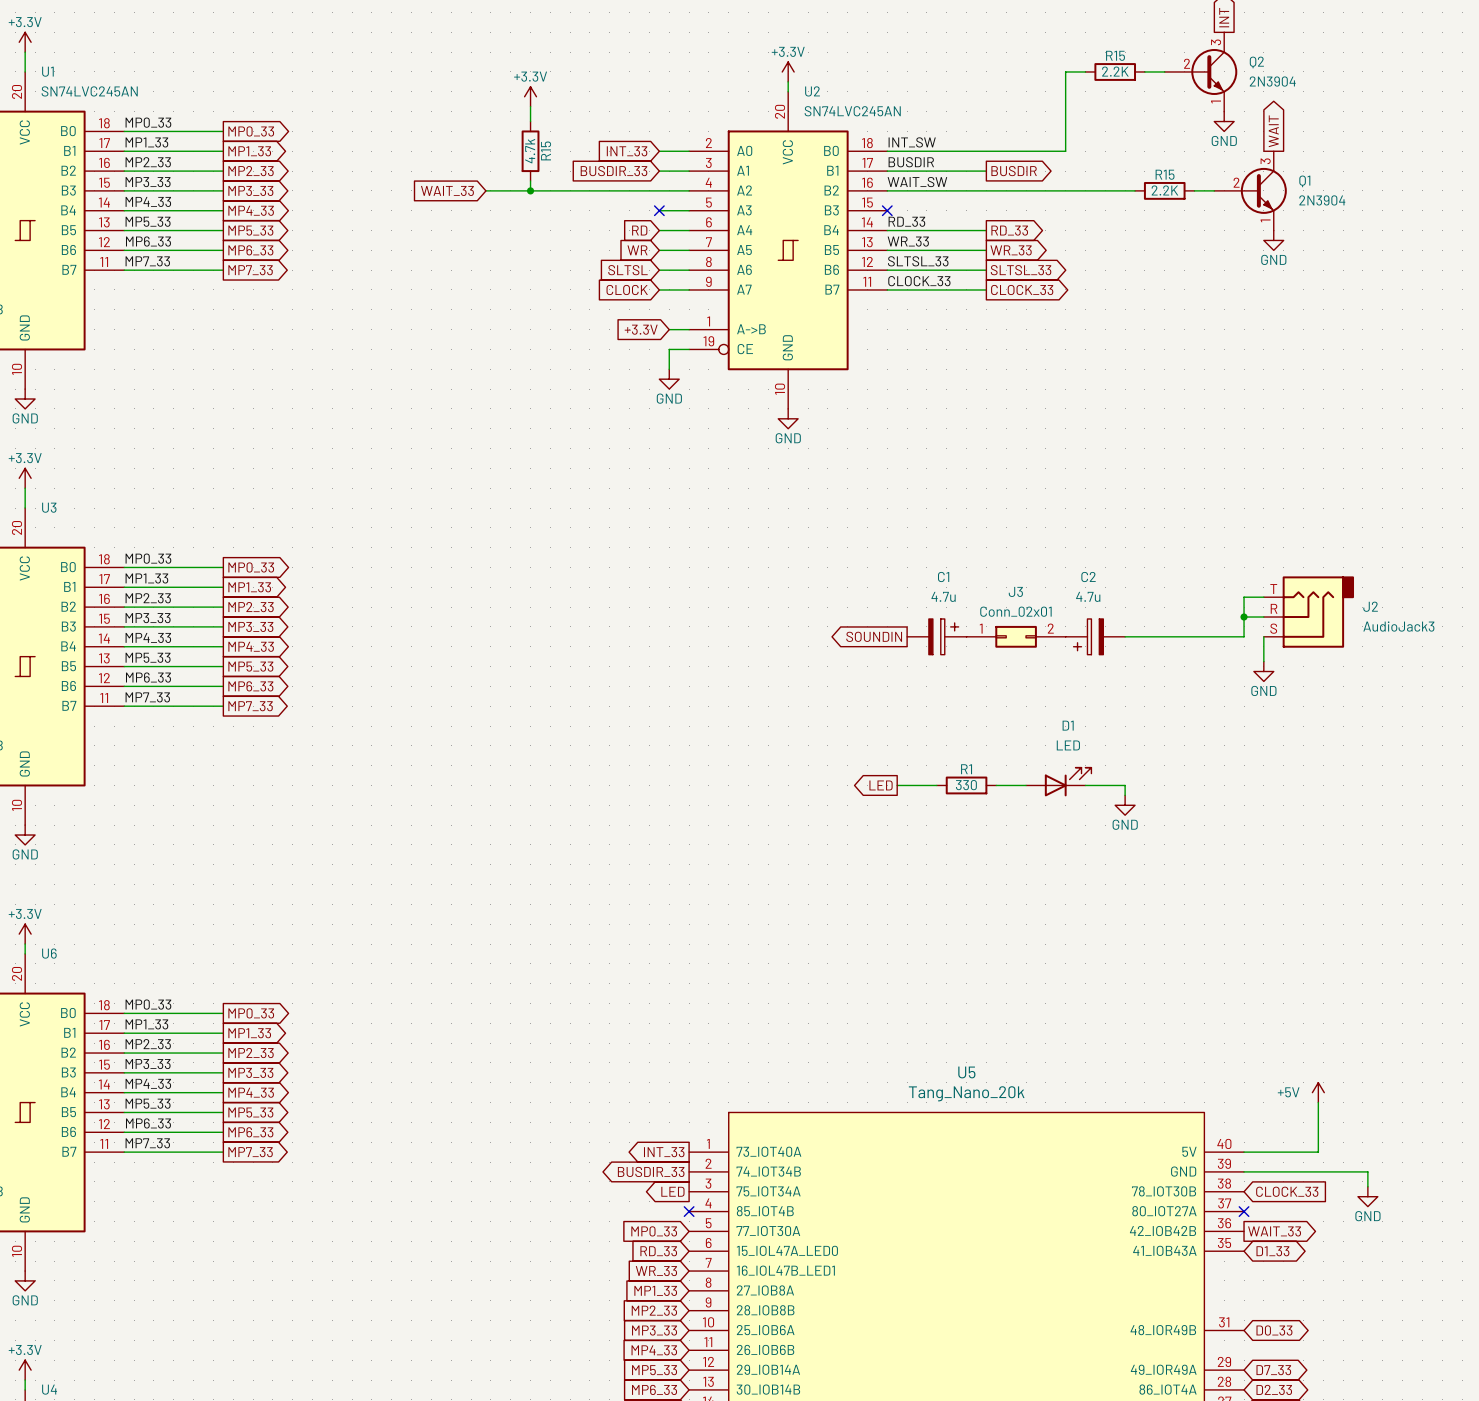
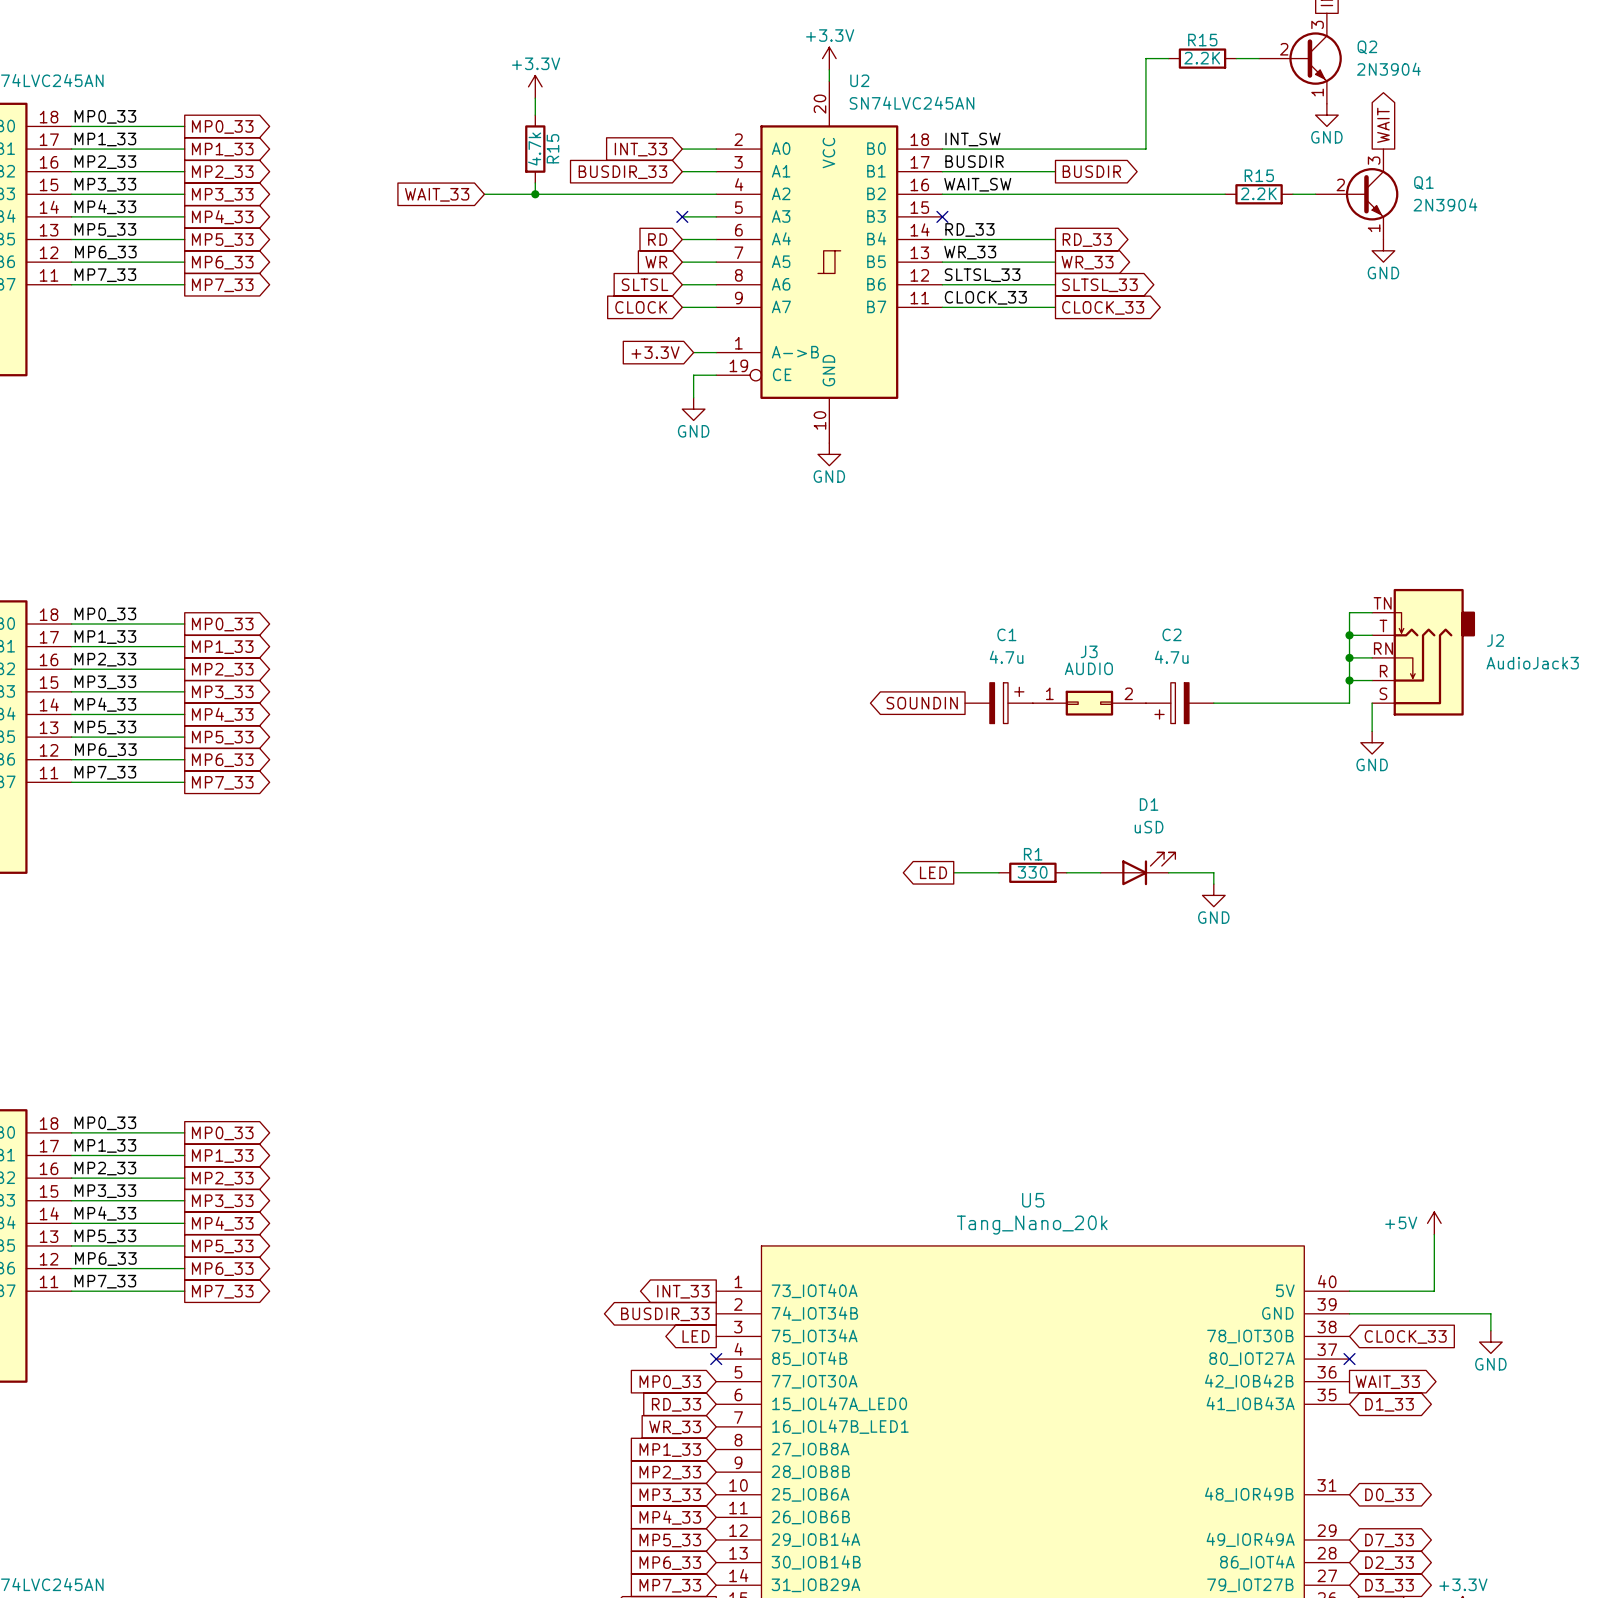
wire: none -> (1372, 612) (1349, 612) (1349, 657)
J2 symbol: [1263, 576, 1355, 648] -> [1372, 588, 1476, 716]
wire: none -> (1349, 635) (1372, 635)
junction: none -> (1349, 635)
junction: none -> (1349, 657)
J3 value: Conn_02x01 (1015, 611) -> AUDIO (1088, 668)
D1 value: LED (1068, 745) -> uSD (1149, 827)

